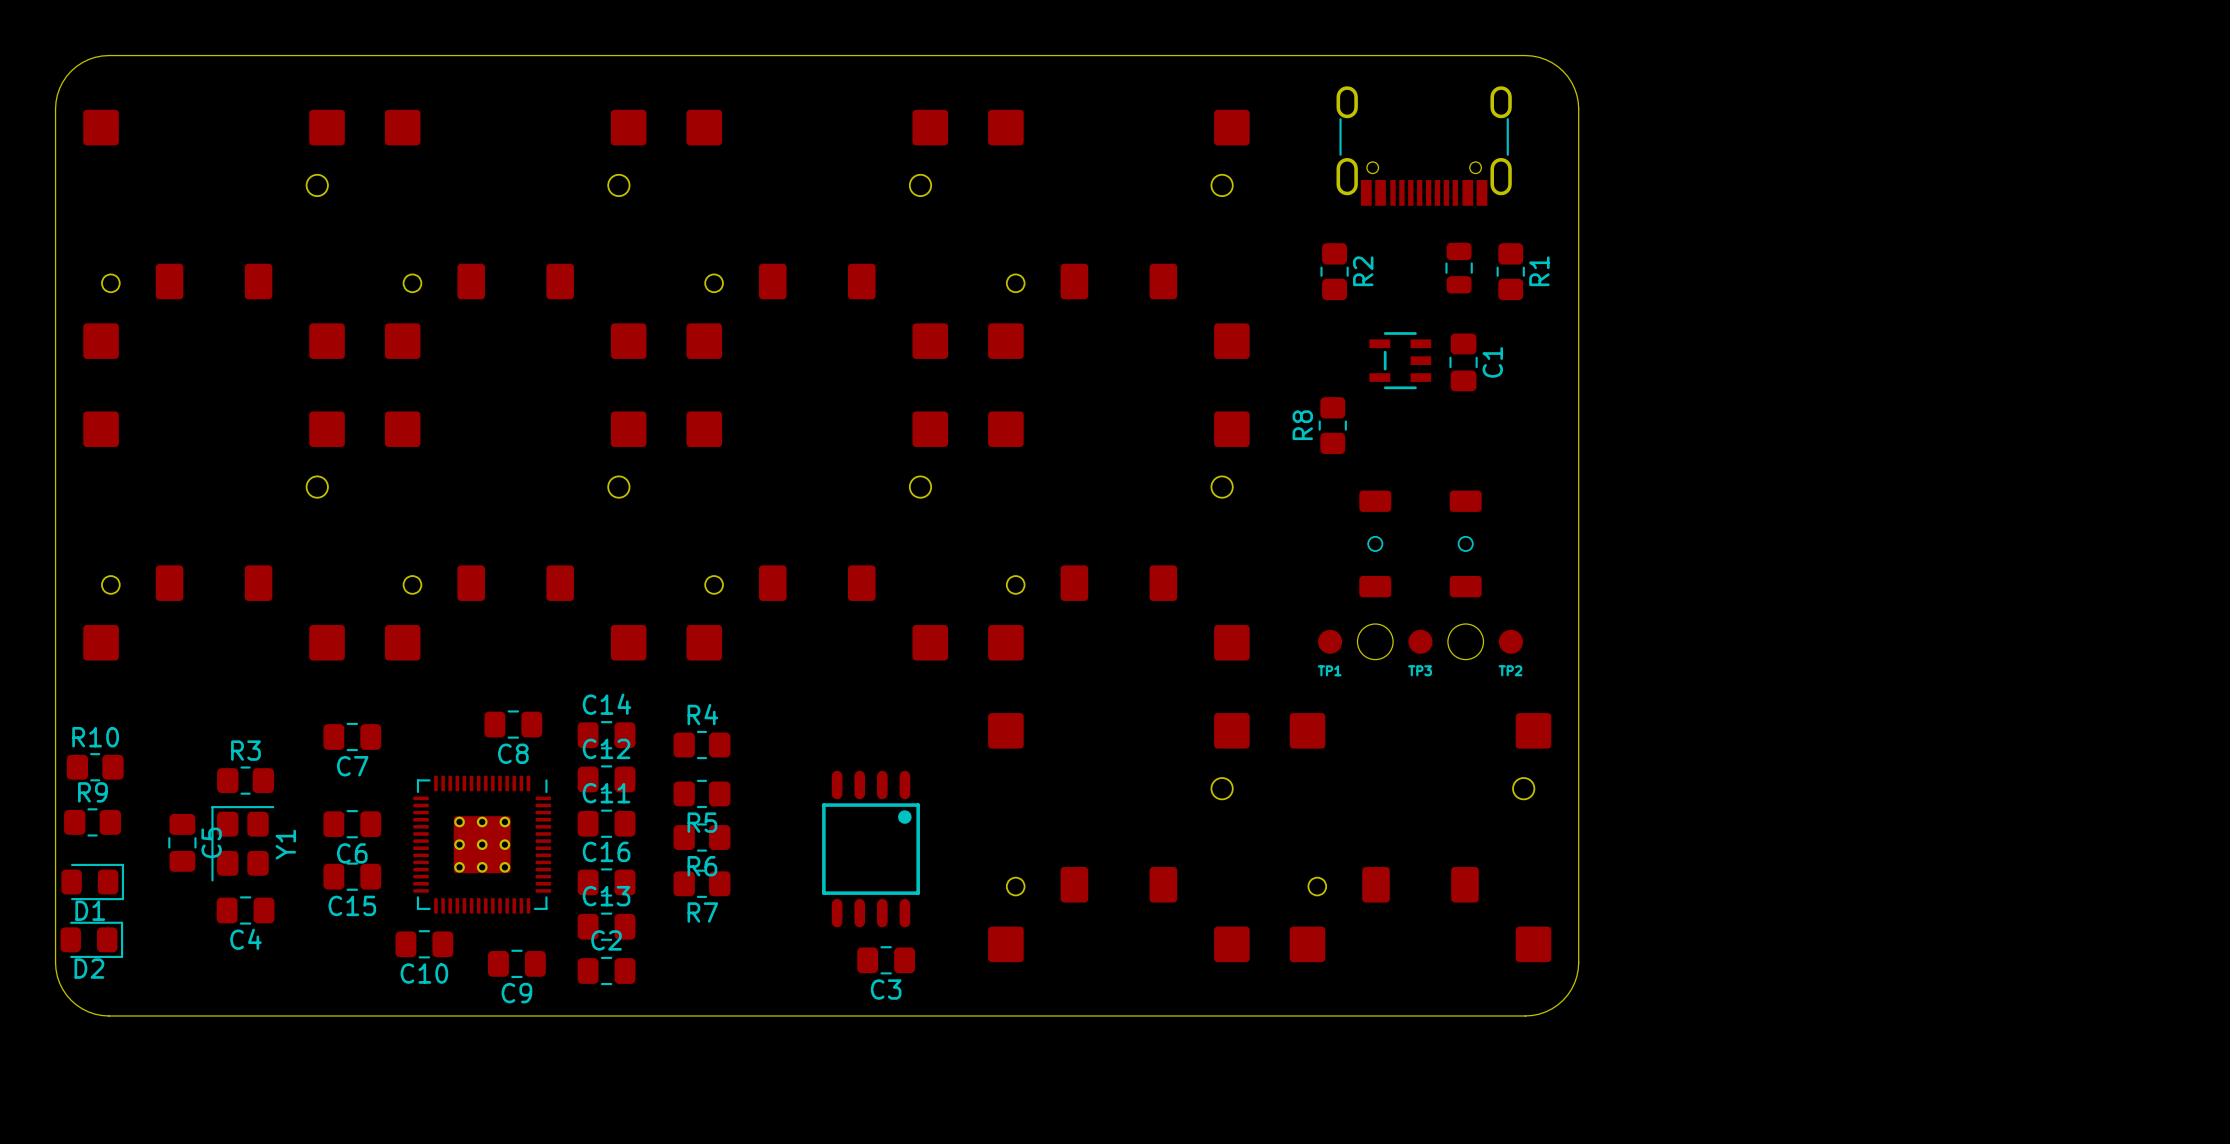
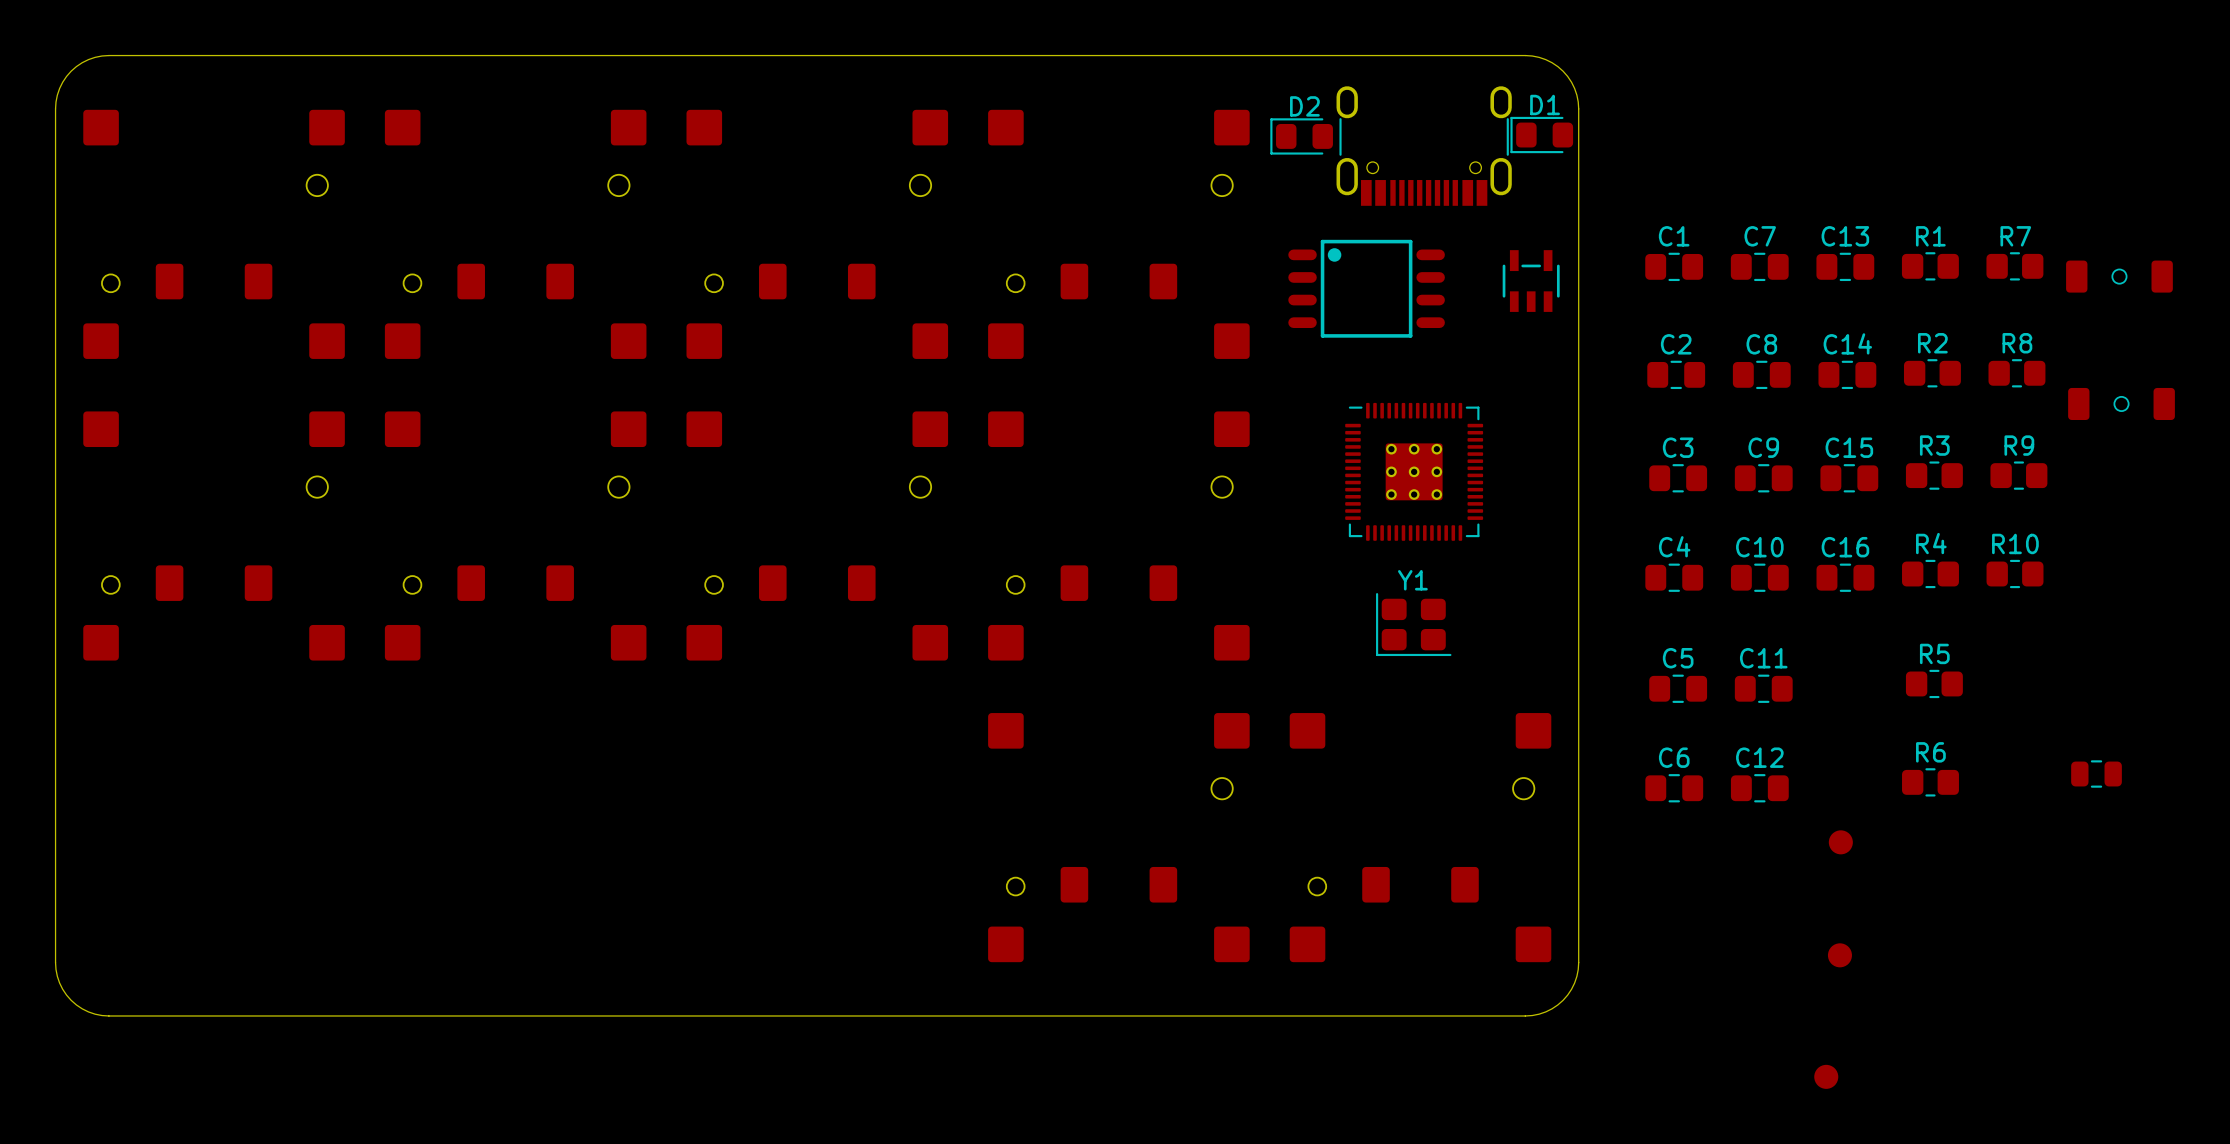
part: (1459, 268) -> none
R2 rotation: 0° (1334, 271) -> 90° clockwise (1932, 373)
R2 position: (1334, 271) -> (1932, 373)
R2 name position: R2 (1363, 271) -> R2 (1932, 343)
R1 rotation: 0° (1510, 271) -> 90° clockwise (1930, 266)
R1 position: (1510, 271) -> (1930, 266)
R1 name position: R1 (1539, 271) -> R1 (1930, 236)
part: none -> (2119, 276)
part: none -> (1366, 288)
part rotation: 0° (1400, 360) -> 90° clockwise (1531, 281)
part position: (1400, 360) -> (1531, 281)
C1 rotation: 0° (1463, 362) -> 90° clockwise (1674, 266)
C1 position: (1463, 362) -> (1674, 266)
C1 name position: C1 (1492, 362) -> C1 (1674, 236)
part: none -> (2121, 403)
R8 rotation: 0° (1332, 425) -> 90° clockwise (2016, 373)
R8 position: (1332, 425) -> (2016, 373)
part: none -> (1414, 471)
part: (1375, 543) -> none
part: (1465, 543) -> none
round board edge: [1357, 623, 1394, 661] -> none
round board edge: [1447, 623, 1484, 661] -> none
TP1: (1330, 641) -> none
TP3: (1420, 641) -> none
TP2: (1510, 641) -> none
C8 position: (513, 724) -> (1761, 374)
C14 position: (606, 735) -> (1847, 374)
C7 position: (352, 736) -> (1759, 266)
R4 position: (701, 745) -> (1930, 574)
C8 name position: C8 (513, 753) -> C8 (1761, 344)
C7 name position: C7 (352, 766) -> C7 (1760, 236)
R10 position: (95, 767) -> (2015, 574)
part: none -> (2096, 774)
C12 position: (606, 779) -> (1759, 788)
R3 position: (245, 780) -> (1934, 475)
R5 position: (701, 793) -> (1934, 683)
R9 position: (92, 822) -> (2018, 475)
R5 name position: R5 (702, 822) -> R5 (1934, 653)
C11 position: (606, 823) -> (1763, 688)
C6 position: (352, 824) -> (1674, 788)
R6 position: (701, 837) -> (1930, 782)
C5 rotation: 0° (182, 842) -> 90° clockwise (1678, 688)
C5 position: (182, 842) -> (1678, 688)
C5 name position: C5 (211, 842) -> C5 (1678, 658)
part: none -> (1840, 842)
Y1 rotation: 0° (242, 843) -> 90° counterclockwise (1413, 624)
Y1 position: (242, 843) -> (1413, 624)
part: (482, 844) -> none
part: (871, 849) -> none
C6 name position: C6 (352, 853) -> C6 (1674, 757)
R6 name position: R6 (702, 866) -> R6 (1930, 752)
C15 position: (352, 876) -> (1849, 478)
D1 rotation: 0° (92, 882) -> 180° (1541, 135)
D1 position: (92, 882) -> (1541, 135)
C16 position: (606, 882) -> (1845, 577)
R7 position: (701, 883) -> (2014, 266)
C15 name position: C15 (352, 905) -> C15 (1849, 447)
C4 position: (245, 910) -> (1674, 577)
R7 name position: R7 (702, 912) -> R7 (2015, 236)
C13 position: (606, 926) -> (1845, 266)
D2 rotation: 0° (91, 939) -> 180° (1301, 136)
D2 position: (91, 939) -> (1301, 136)
C4 name position: C4 (245, 939) -> C4 (1674, 546)
C10 position: (424, 944) -> (1759, 577)
part: none -> (1839, 955)
C3 position: (886, 960) -> (1678, 478)
C9 position: (516, 963) -> (1763, 478)
C2 position: (606, 970) -> (1676, 374)
C10 name position: C10 (424, 973) -> C10 (1759, 547)
C3 name position: C3 (886, 989) -> C3 (1678, 447)
C9 name position: C9 (516, 993) -> C9 (1763, 447)
part: none -> (1826, 1076)

